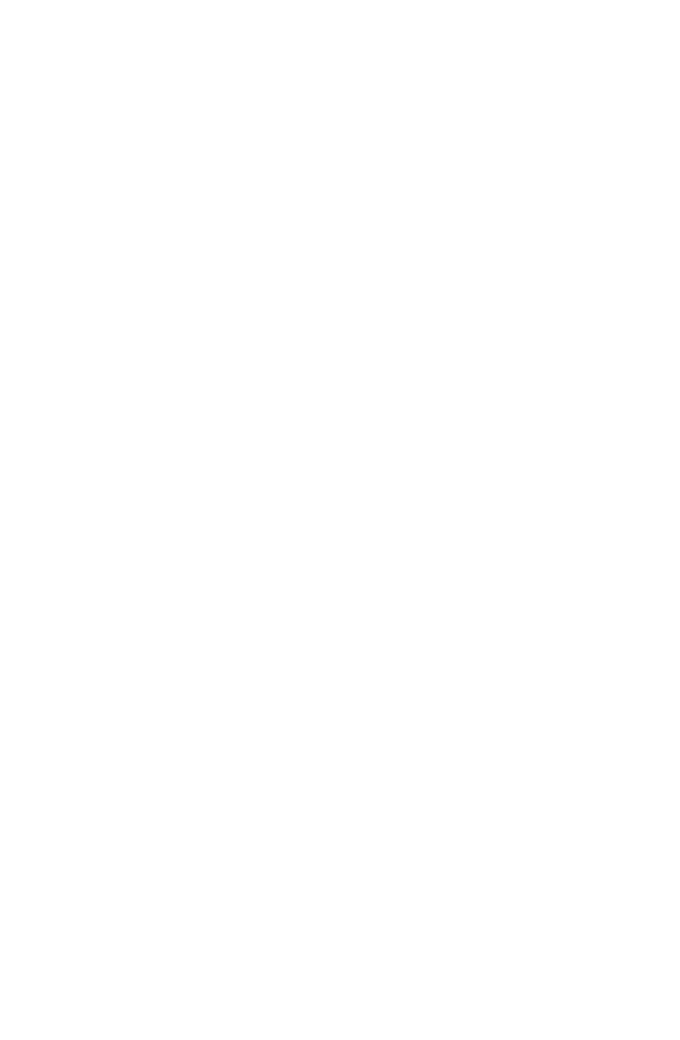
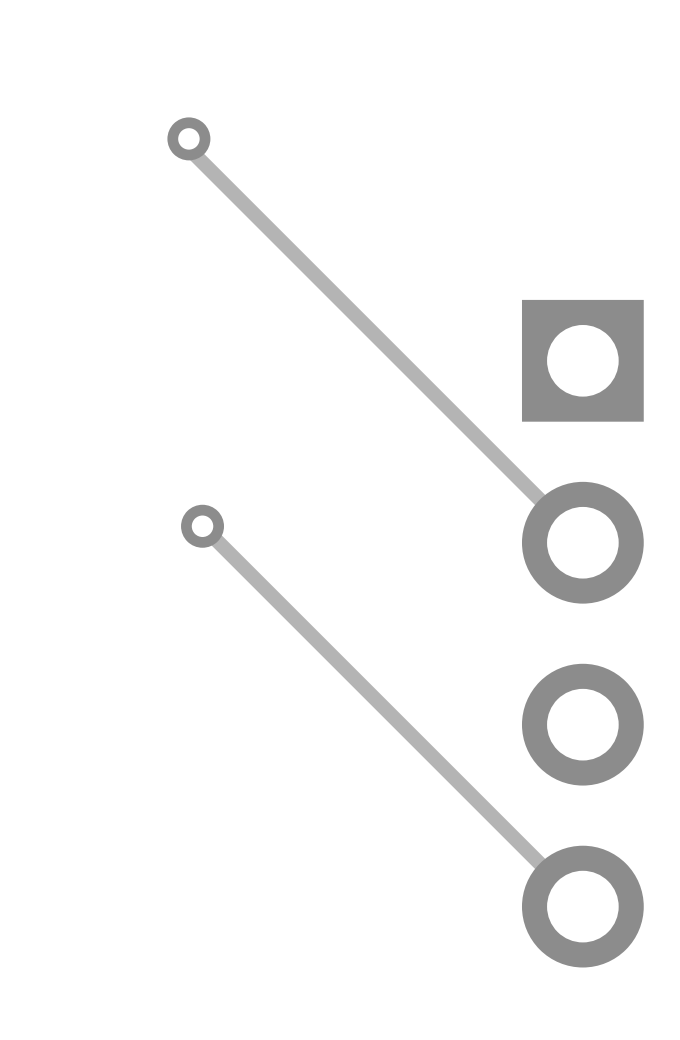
track: none -> (188, 138) (188, 148) (582, 542)
via: none -> (188, 138)
track: none -> (202, 526) (582, 906)
via: none -> (202, 526)
part: none -> (582, 633)

